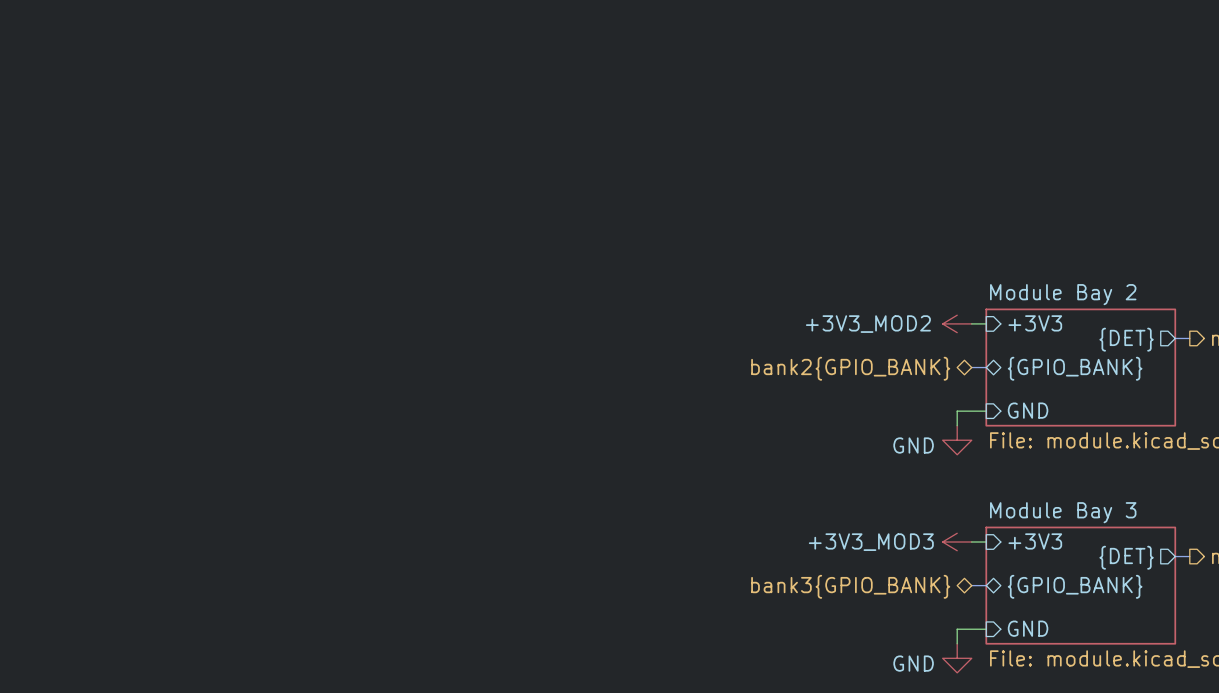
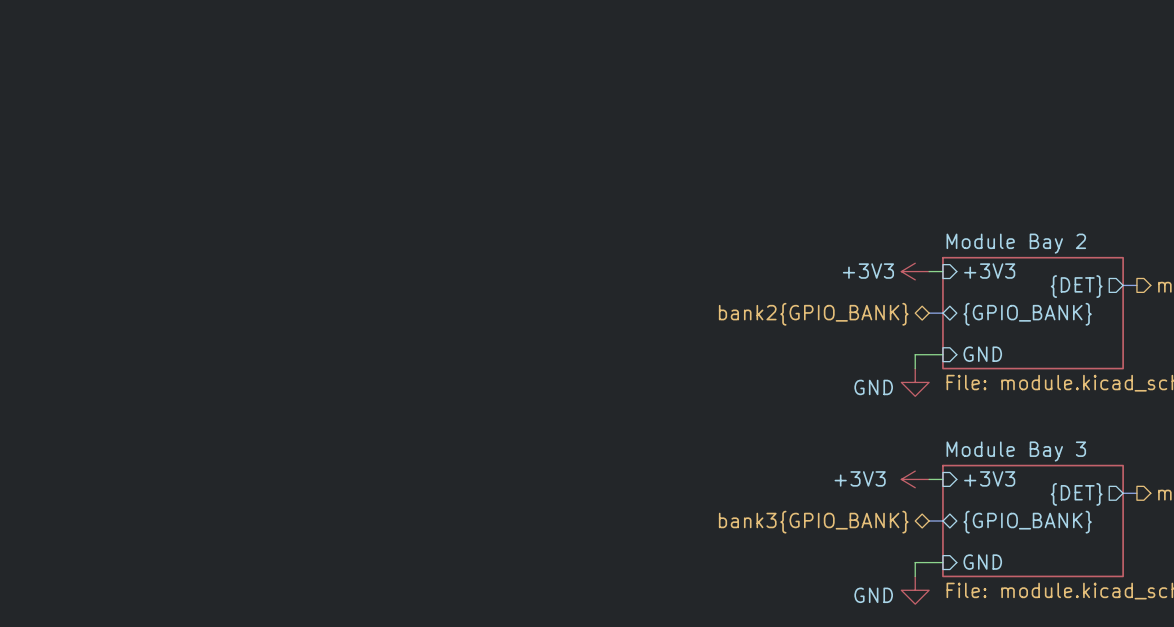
power symbol: +3V3_MOD2 (957, 323) -> +3V3 (915, 271)
power symbol: +3V3_MOD3 (957, 542) -> +3V3 (915, 479)

